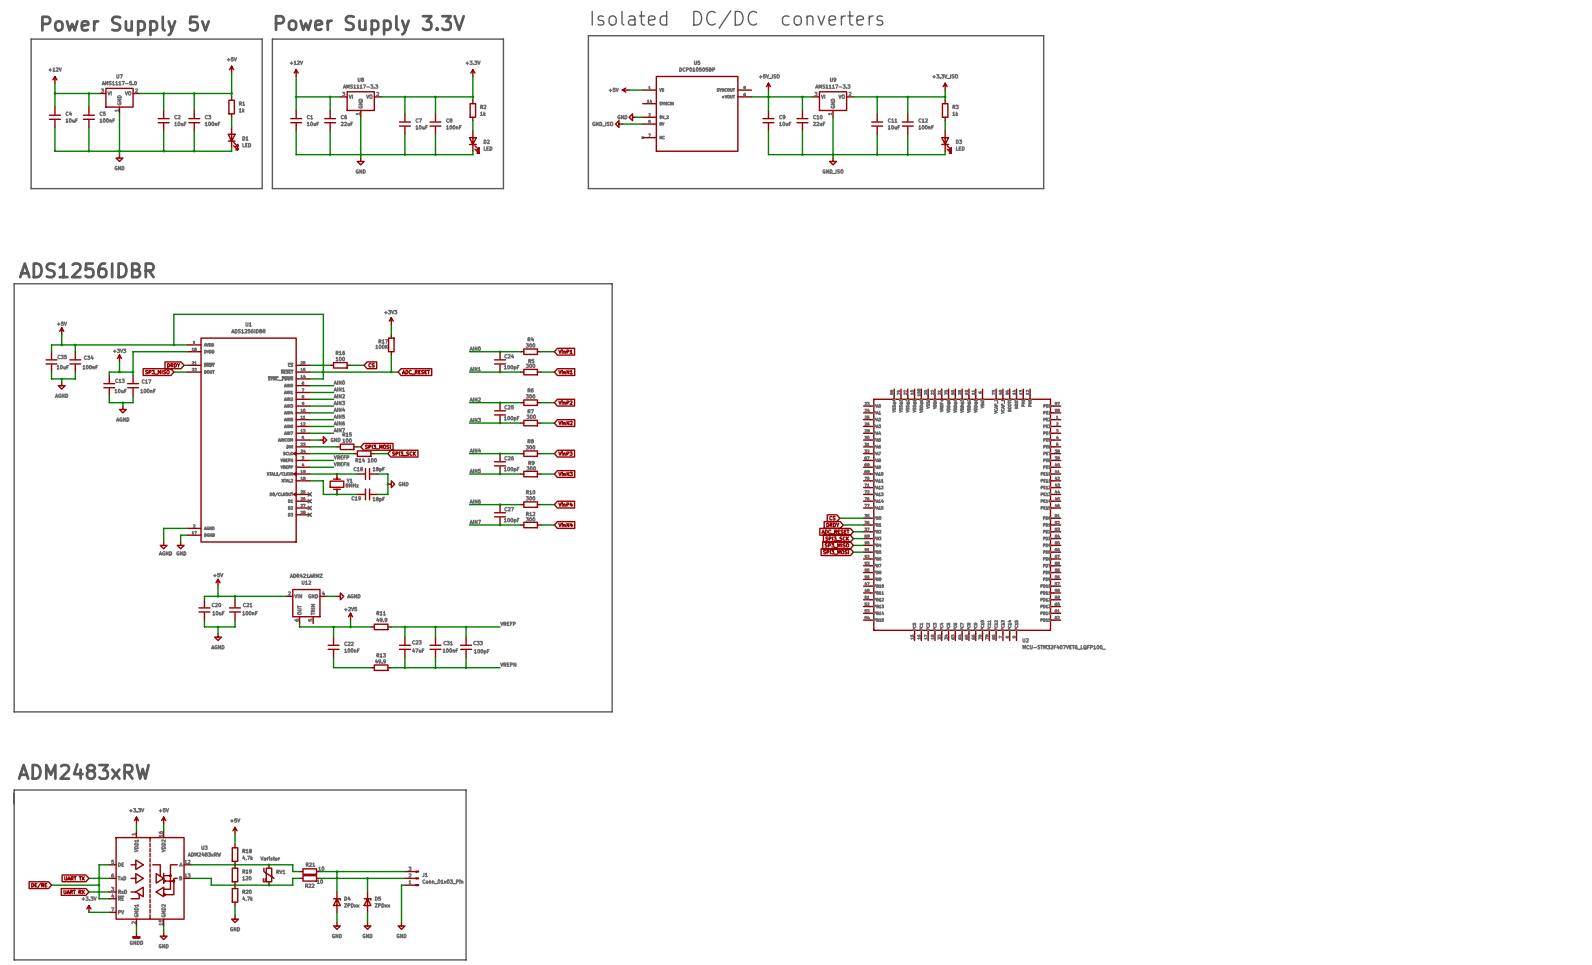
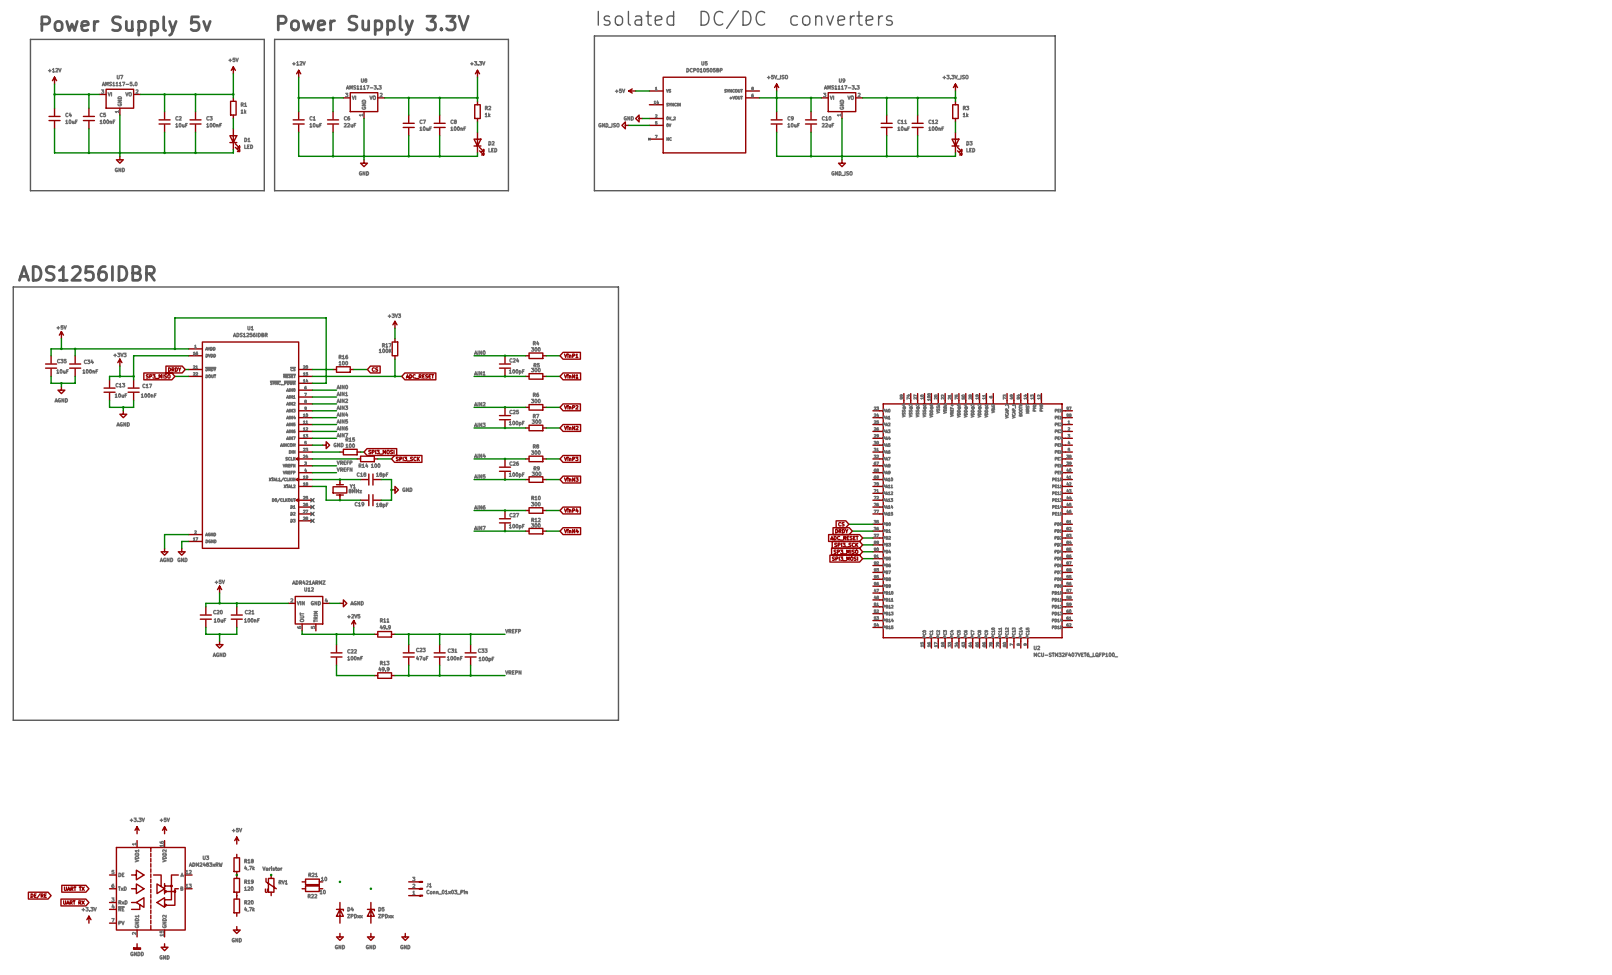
text: ADM2483xRW (83, 771) -> none
line: (14, 790) (14, 959) (466, 959) (466, 790) (14, 790) -> none
wire: (136, 824) (136, 830) -> none
wire: (163, 824) (163, 830) -> none
wire: (235, 834) (235, 844) -> none
wire: (109, 864) (99, 864) (99, 898) (109, 898) -> none
wire: (190, 864) (292, 864) (292, 871) (299, 871) -> none
wire: (319, 871) (404, 871) -> none
wire: (336, 871) (336, 891) -> none
wire: (88, 878) (109, 878) -> none
wire: (190, 878) (211, 878) (211, 885) (292, 885) (292, 878) (299, 878) -> none
wire: (319, 878) (404, 878) -> none
wire: (367, 878) (367, 891) -> none
wire: (51, 885) (99, 885) -> none
wire: (404, 885) (401, 885) (401, 922) -> none
wire: (88, 891) (109, 891) -> none
wire: (235, 905) (235, 915) -> none
wire: (88, 912) (109, 912) -> none
wire: (336, 912) (336, 922) -> none
wire: (367, 912) (367, 922) -> none
wire: (136, 925) (136, 932) -> none
wire: (163, 925) (163, 932) -> none

